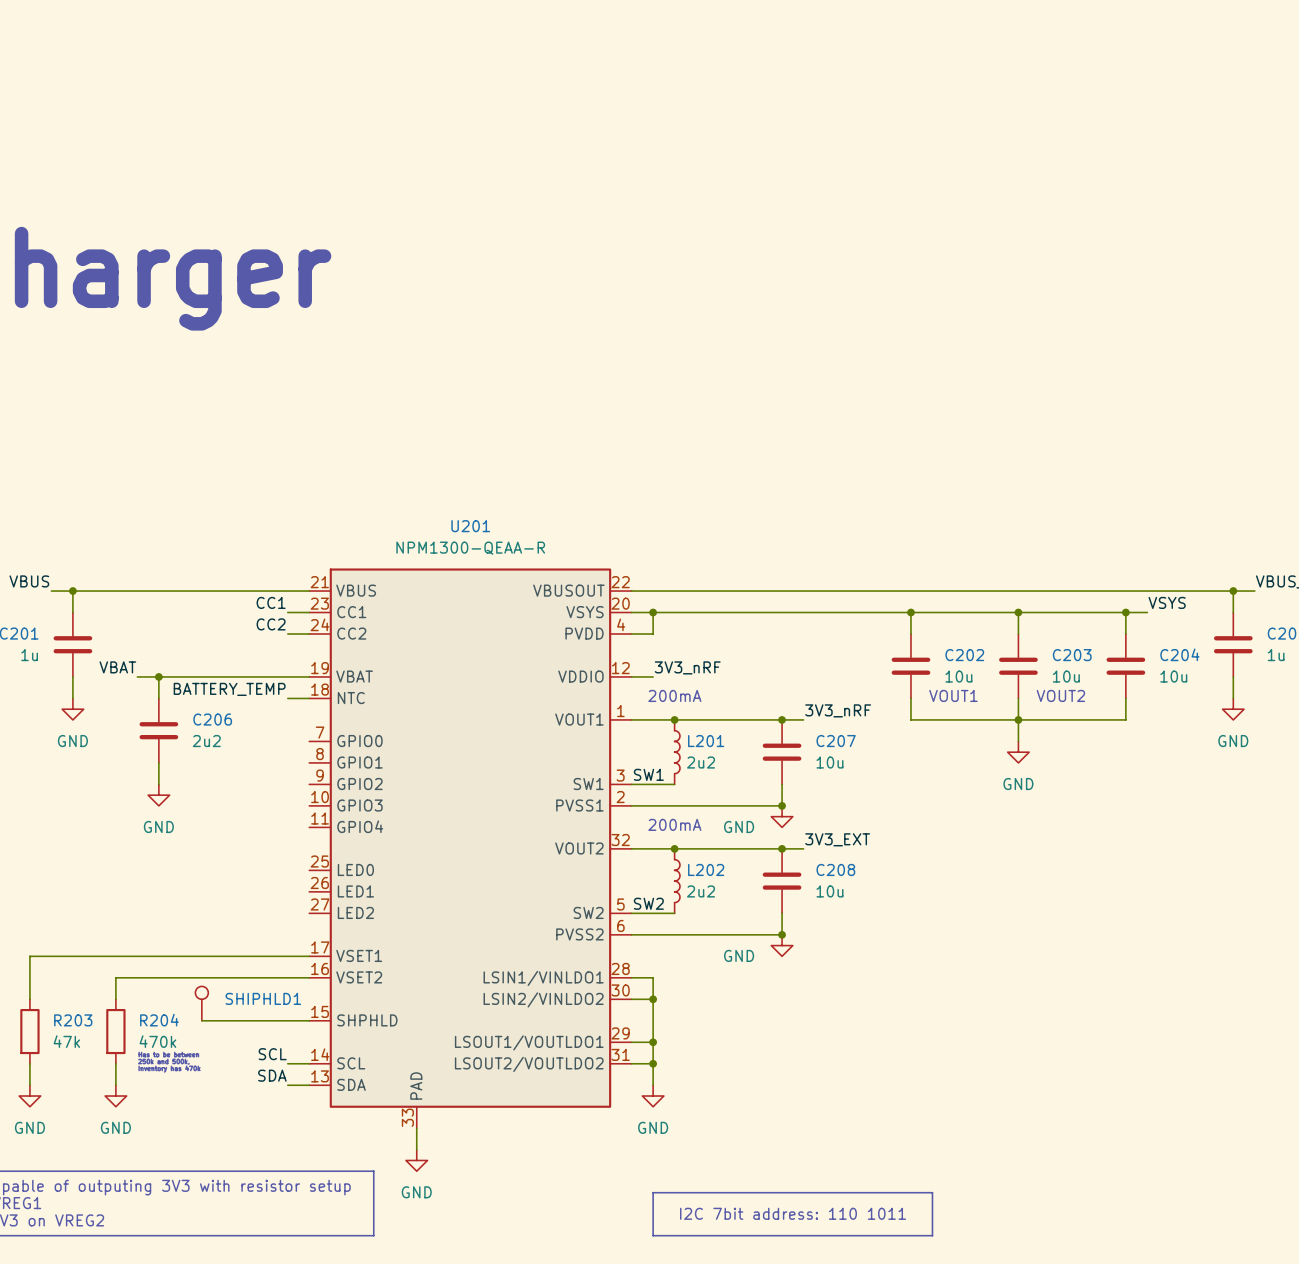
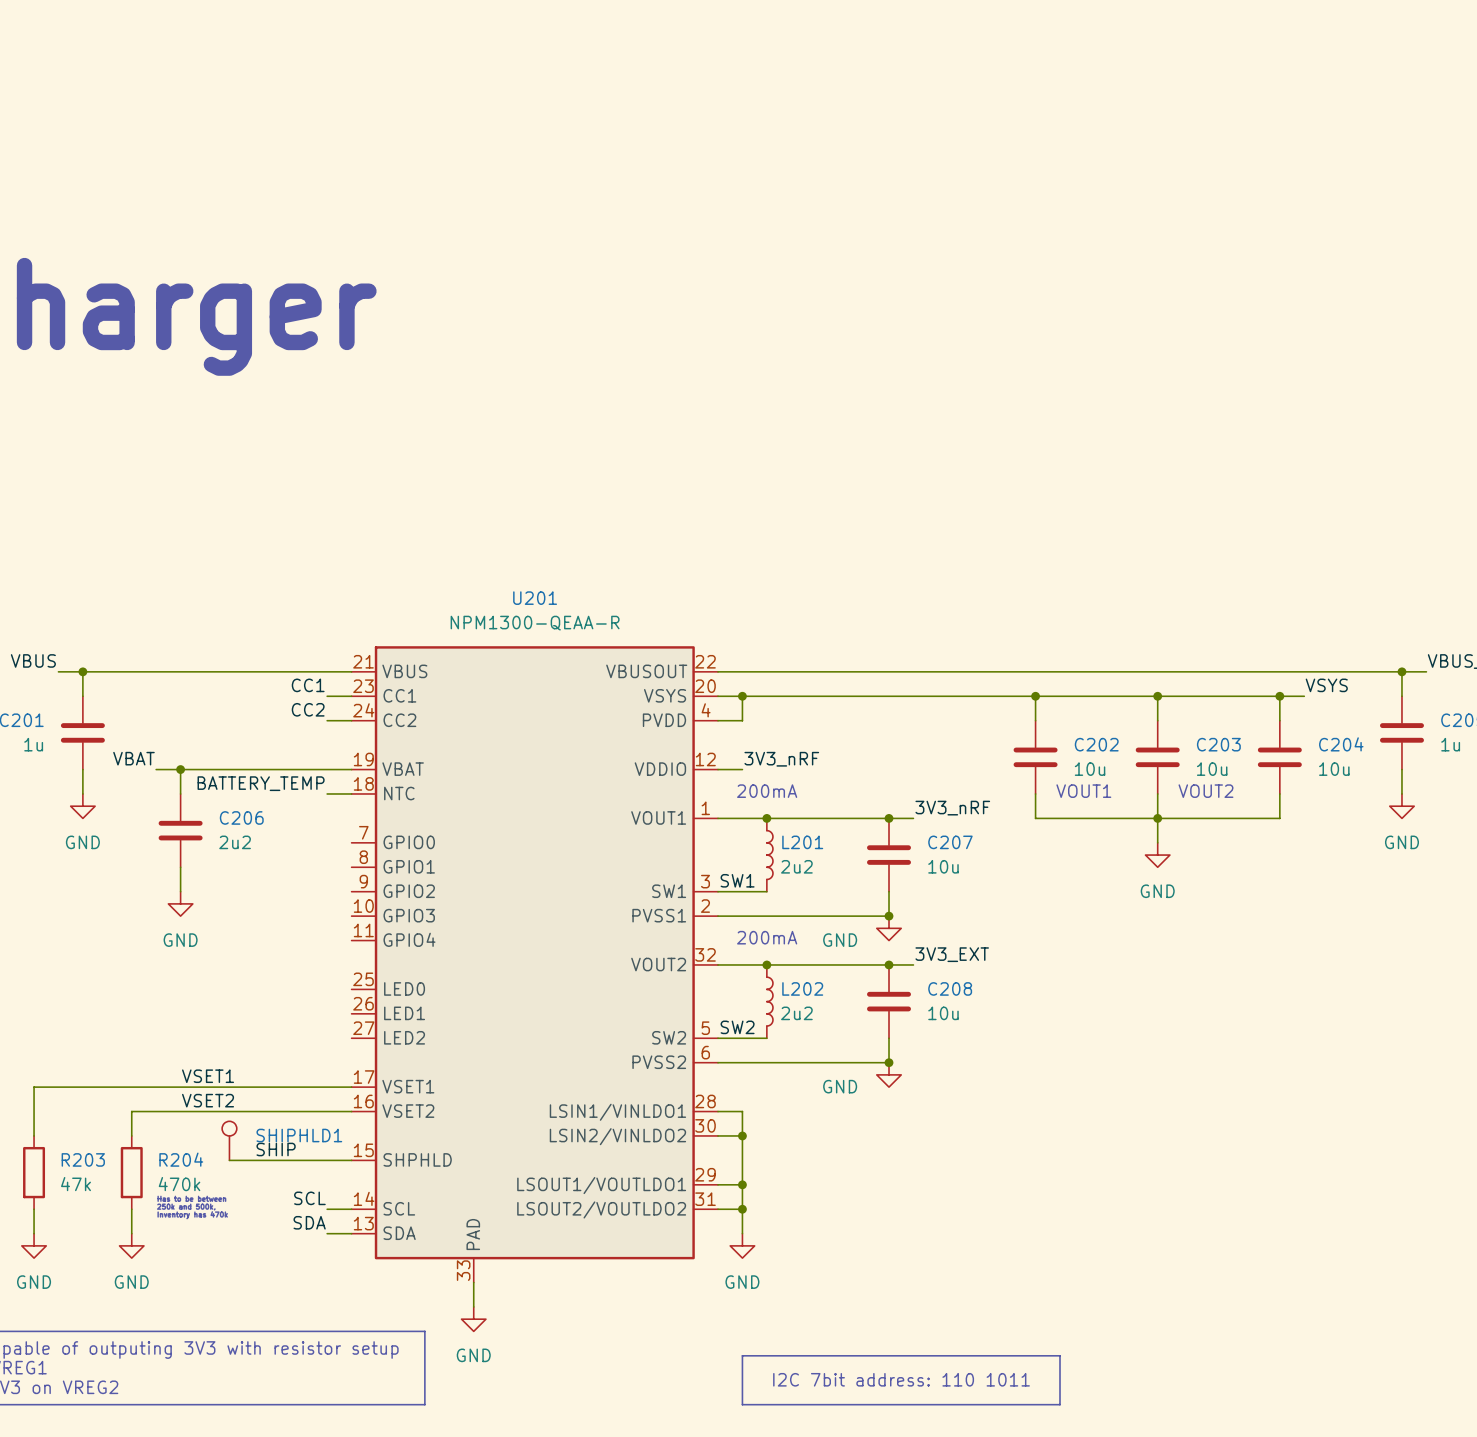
label: none -> VSET1 (208, 1076)
label: none -> VSET2 (208, 1100)
label: none -> SHIP (276, 1149)

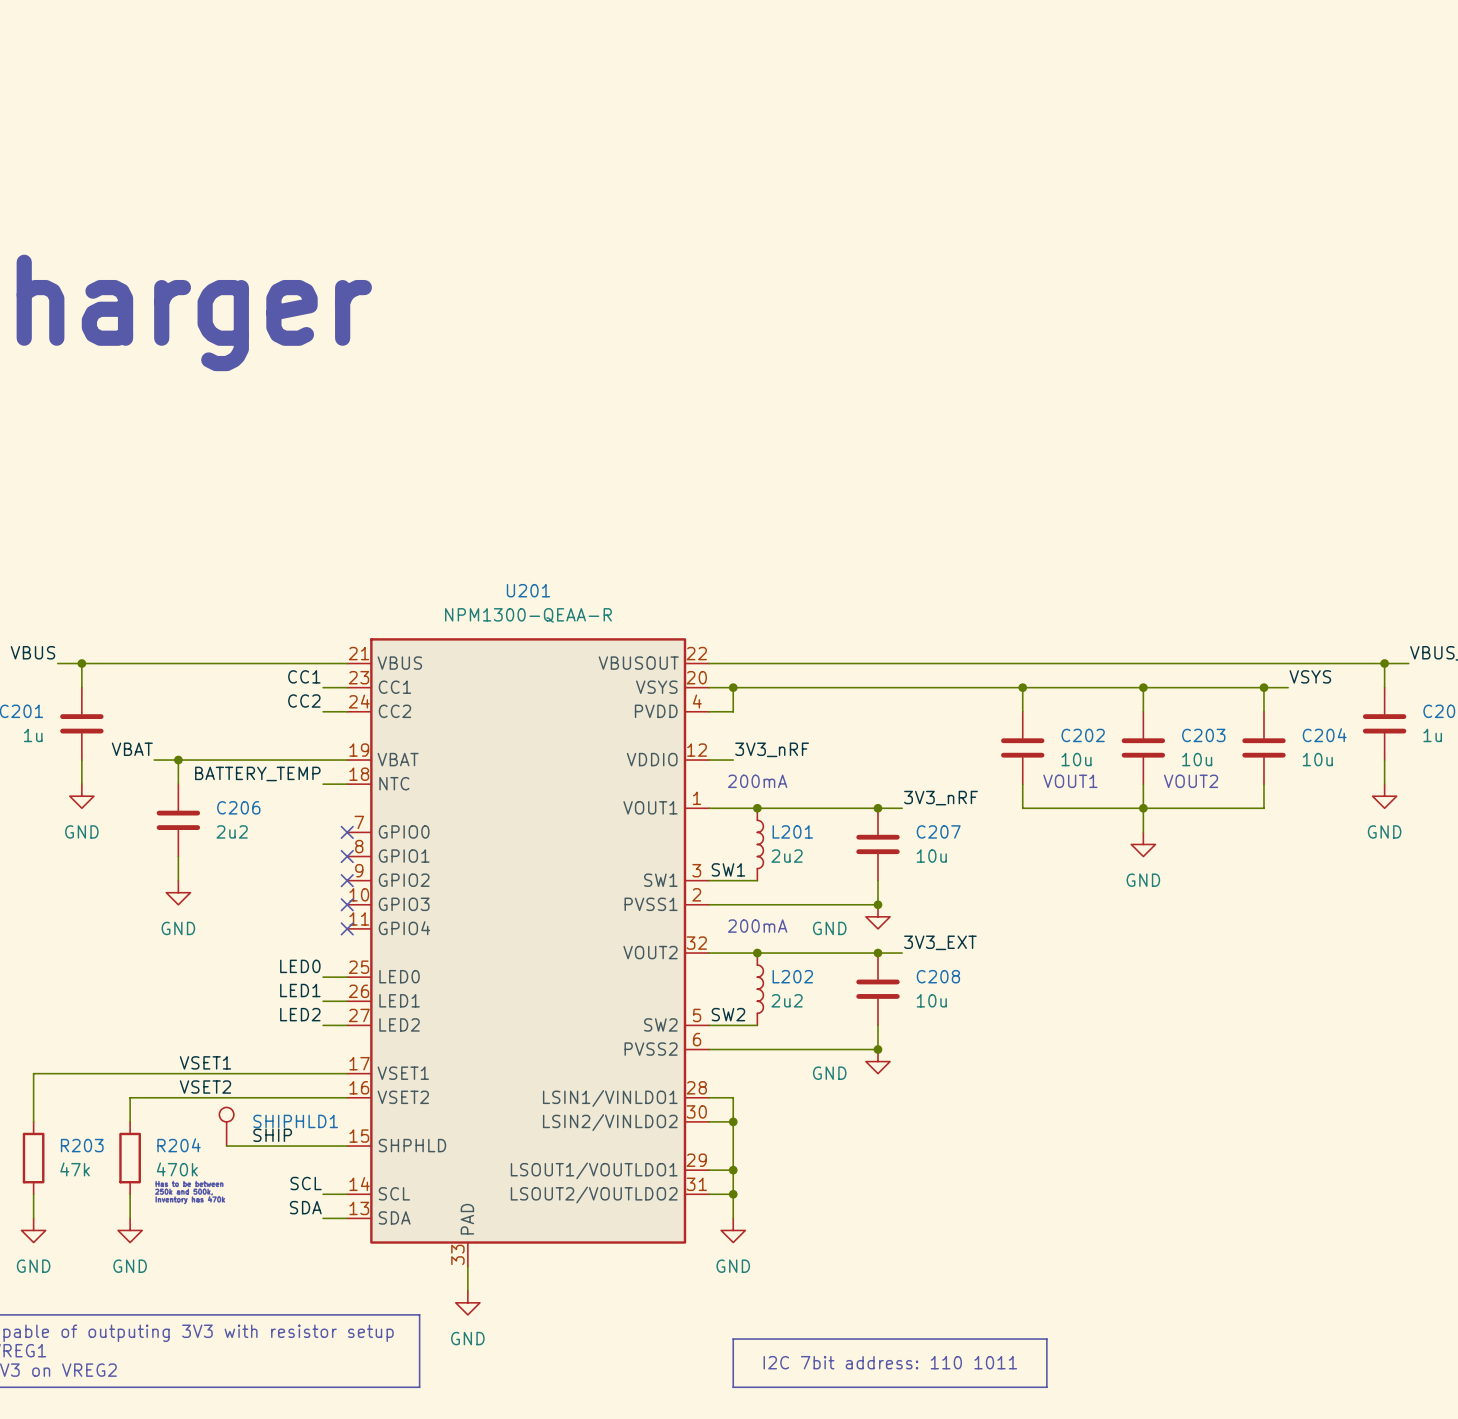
no-connect mark: none -> (347, 832)
no-connect mark: none -> (347, 856)
no-connect mark: none -> (347, 880)
no-connect mark: none -> (347, 904)
no-connect mark: none -> (347, 928)
label: none -> LED0 (300, 966)
wire: none -> (323, 977) (347, 977)
label: none -> LED1 (300, 990)
wire: none -> (323, 1001) (347, 1001)
label: none -> LED2 (300, 1014)
wire: none -> (323, 1025) (347, 1025)

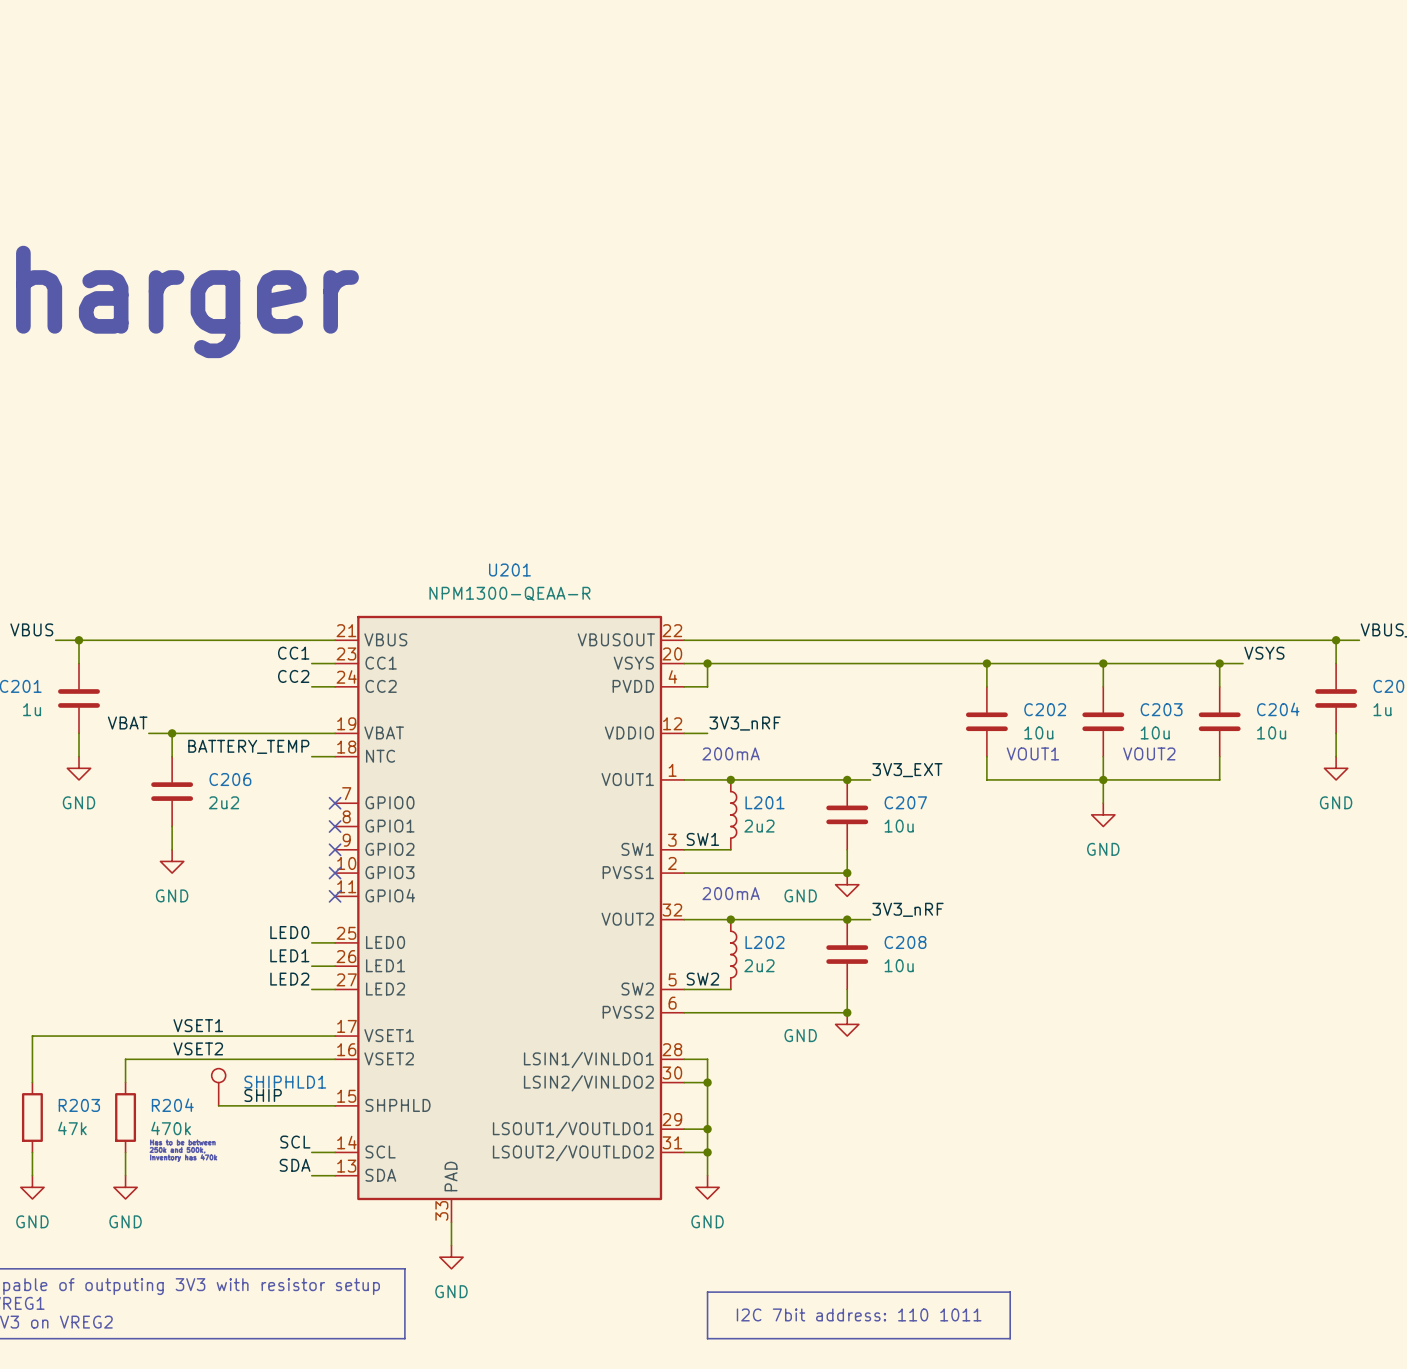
label: 3V3_nRF (940, 798) -> 3V3_EXT (907, 770)
label: 3V3_EXT (940, 942) -> 3V3_nRF (908, 909)

